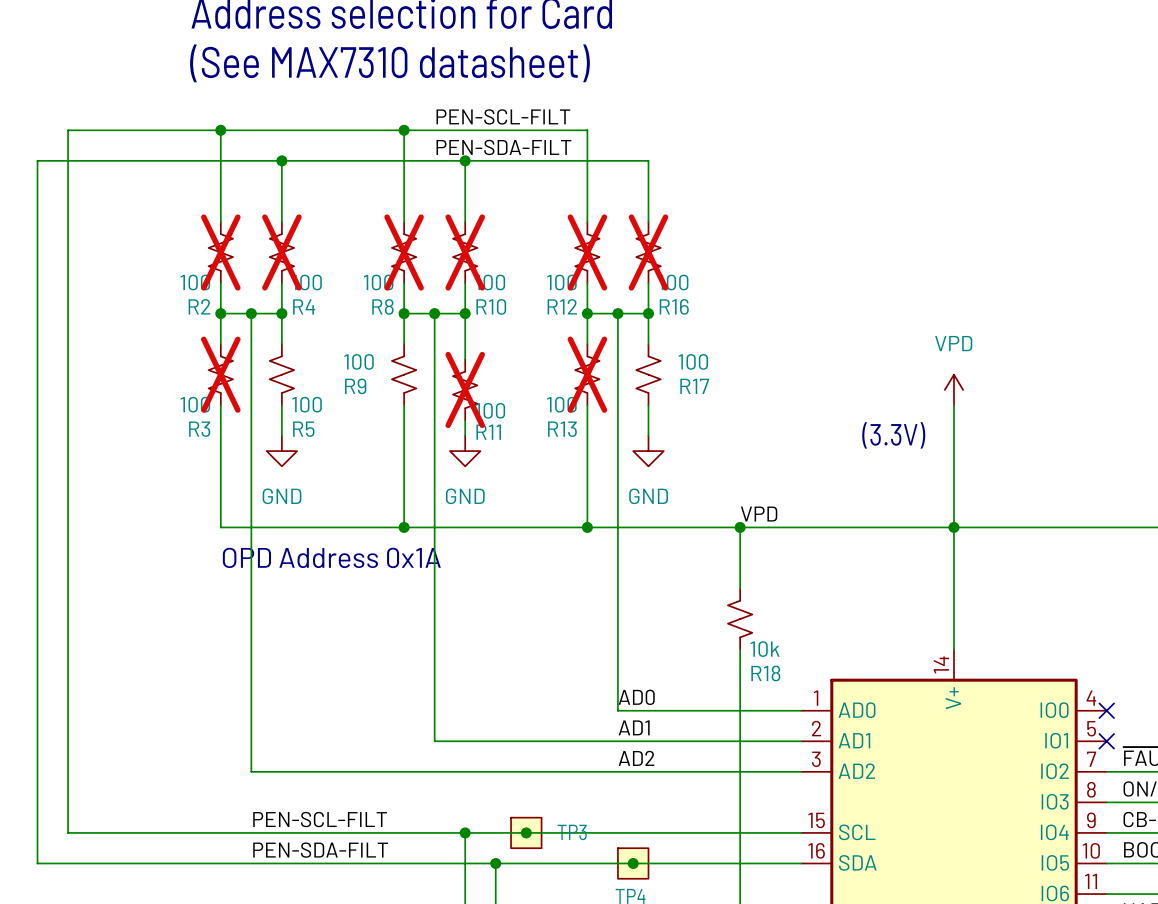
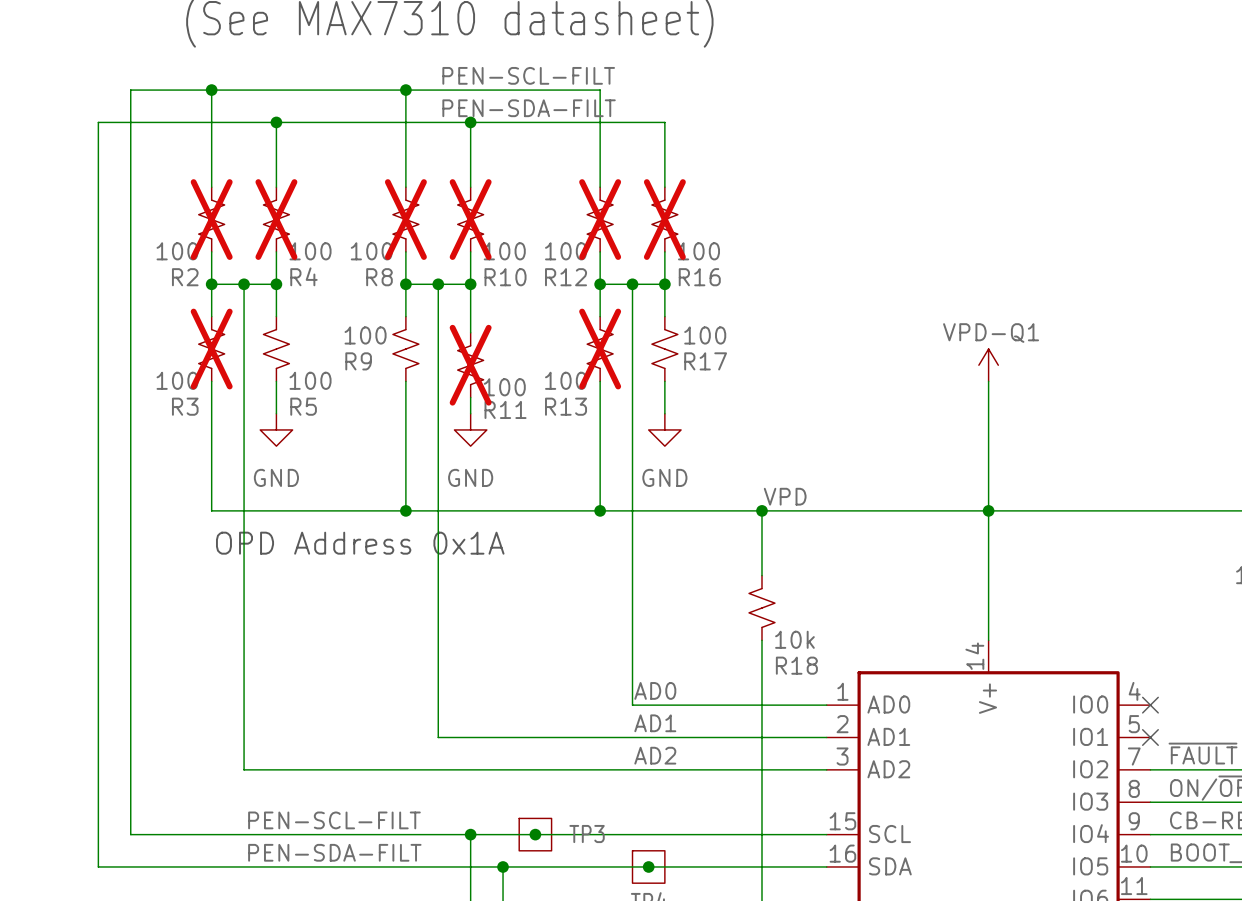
wire: (144, 130) (68, 130) (68, 832) (144, 832) -> (130, 90) (130, 834)
wire: (113, 160) (37, 160) (37, 863) (113, 863) -> (98, 122) (98, 866)
power symbol: VPD (953, 389) -> VPD-Q1 (988, 365)
text: (3.3V) (893, 435) -> none

